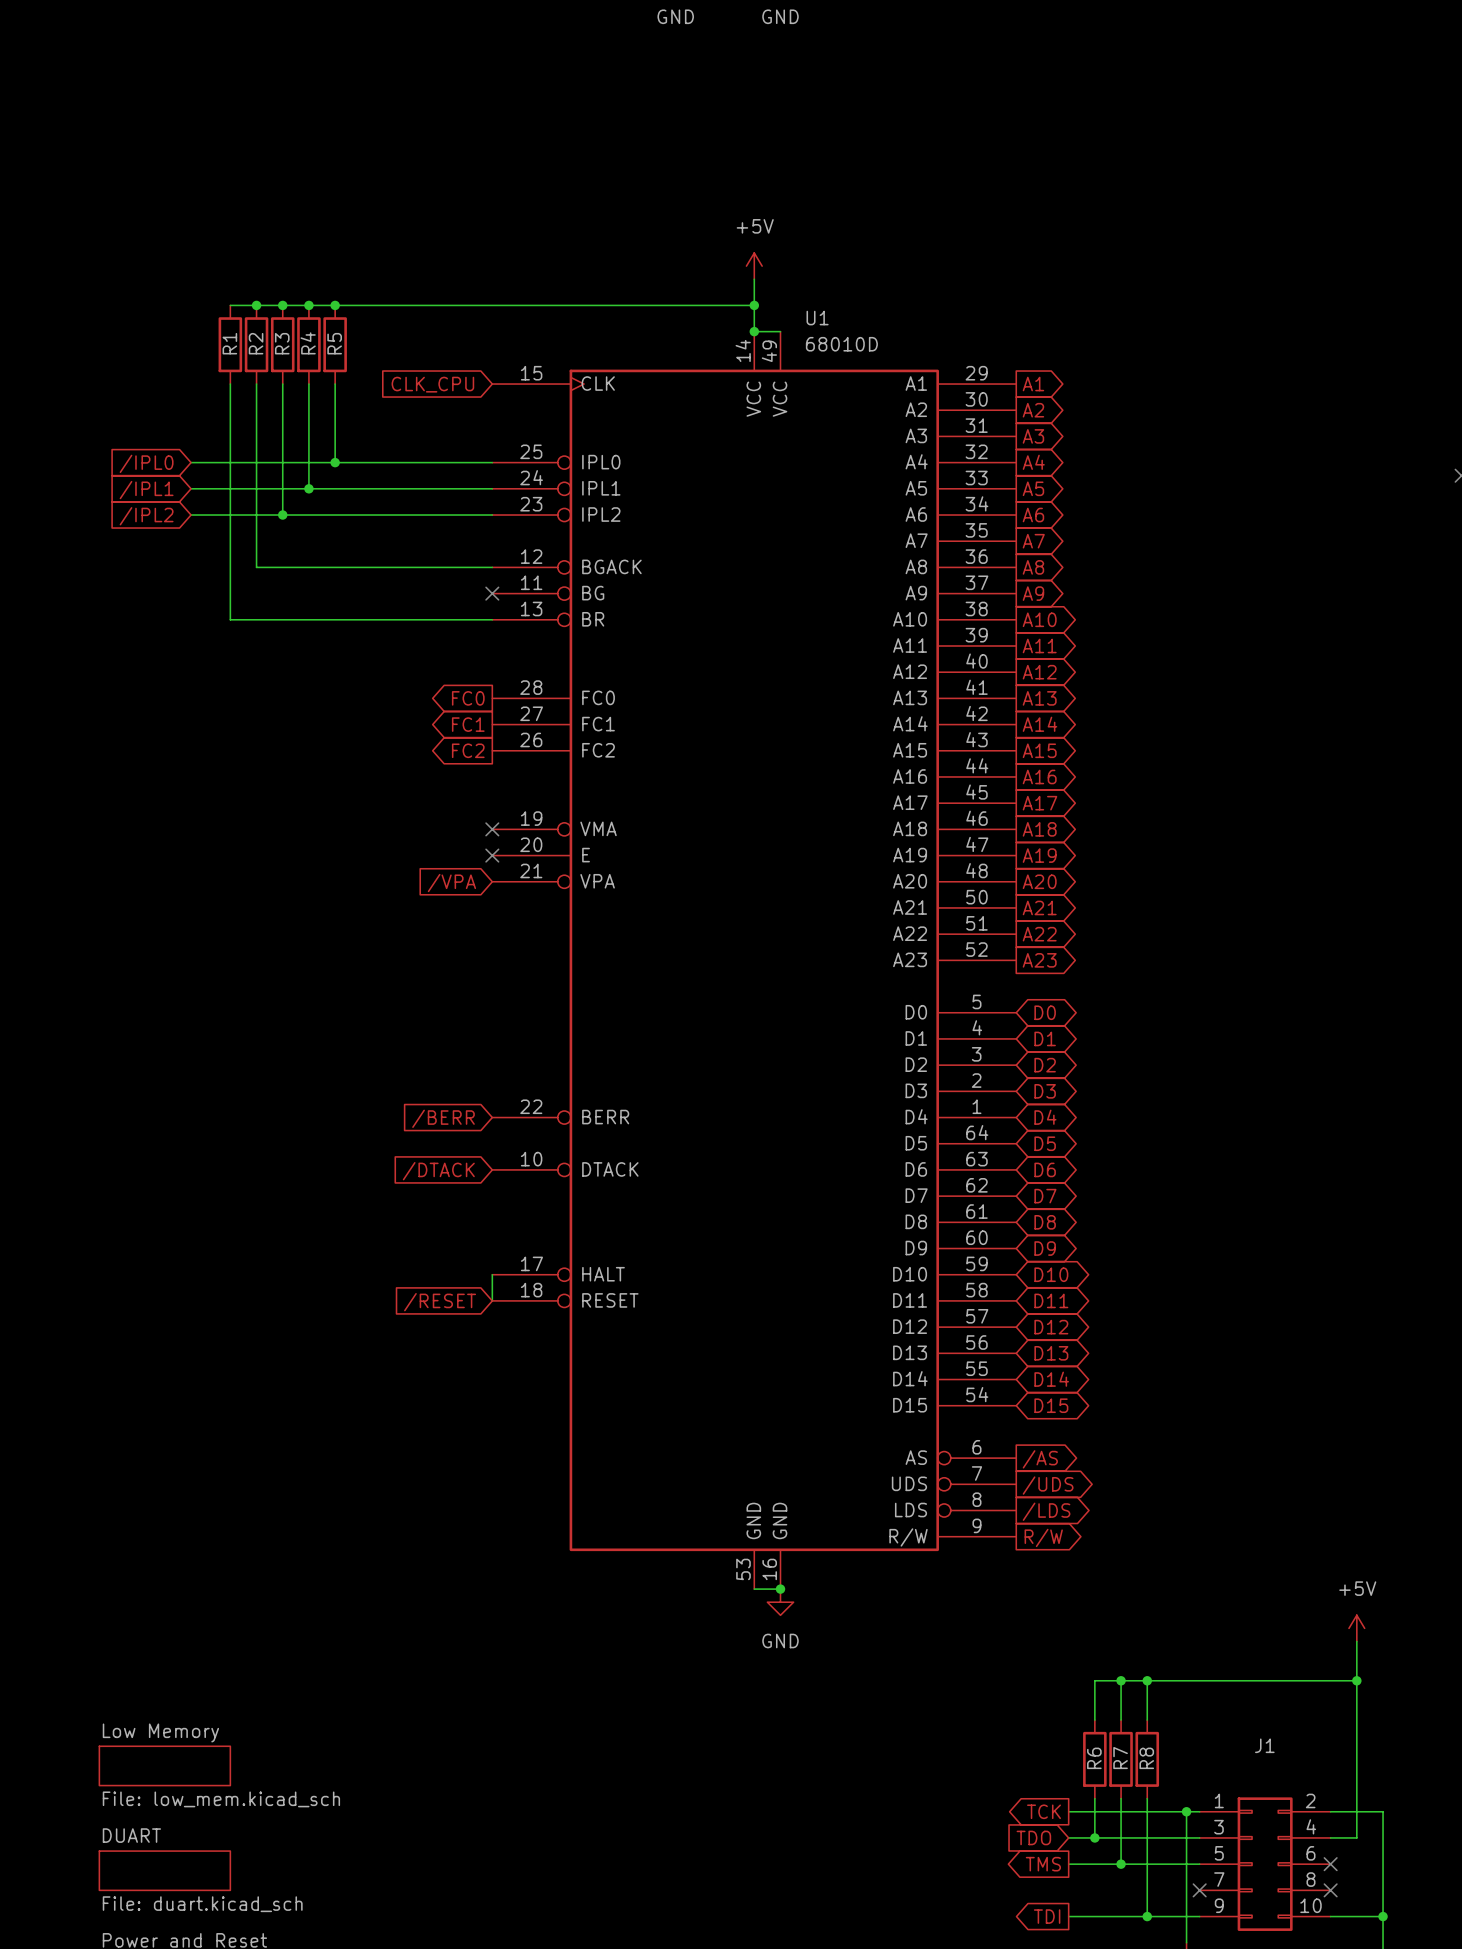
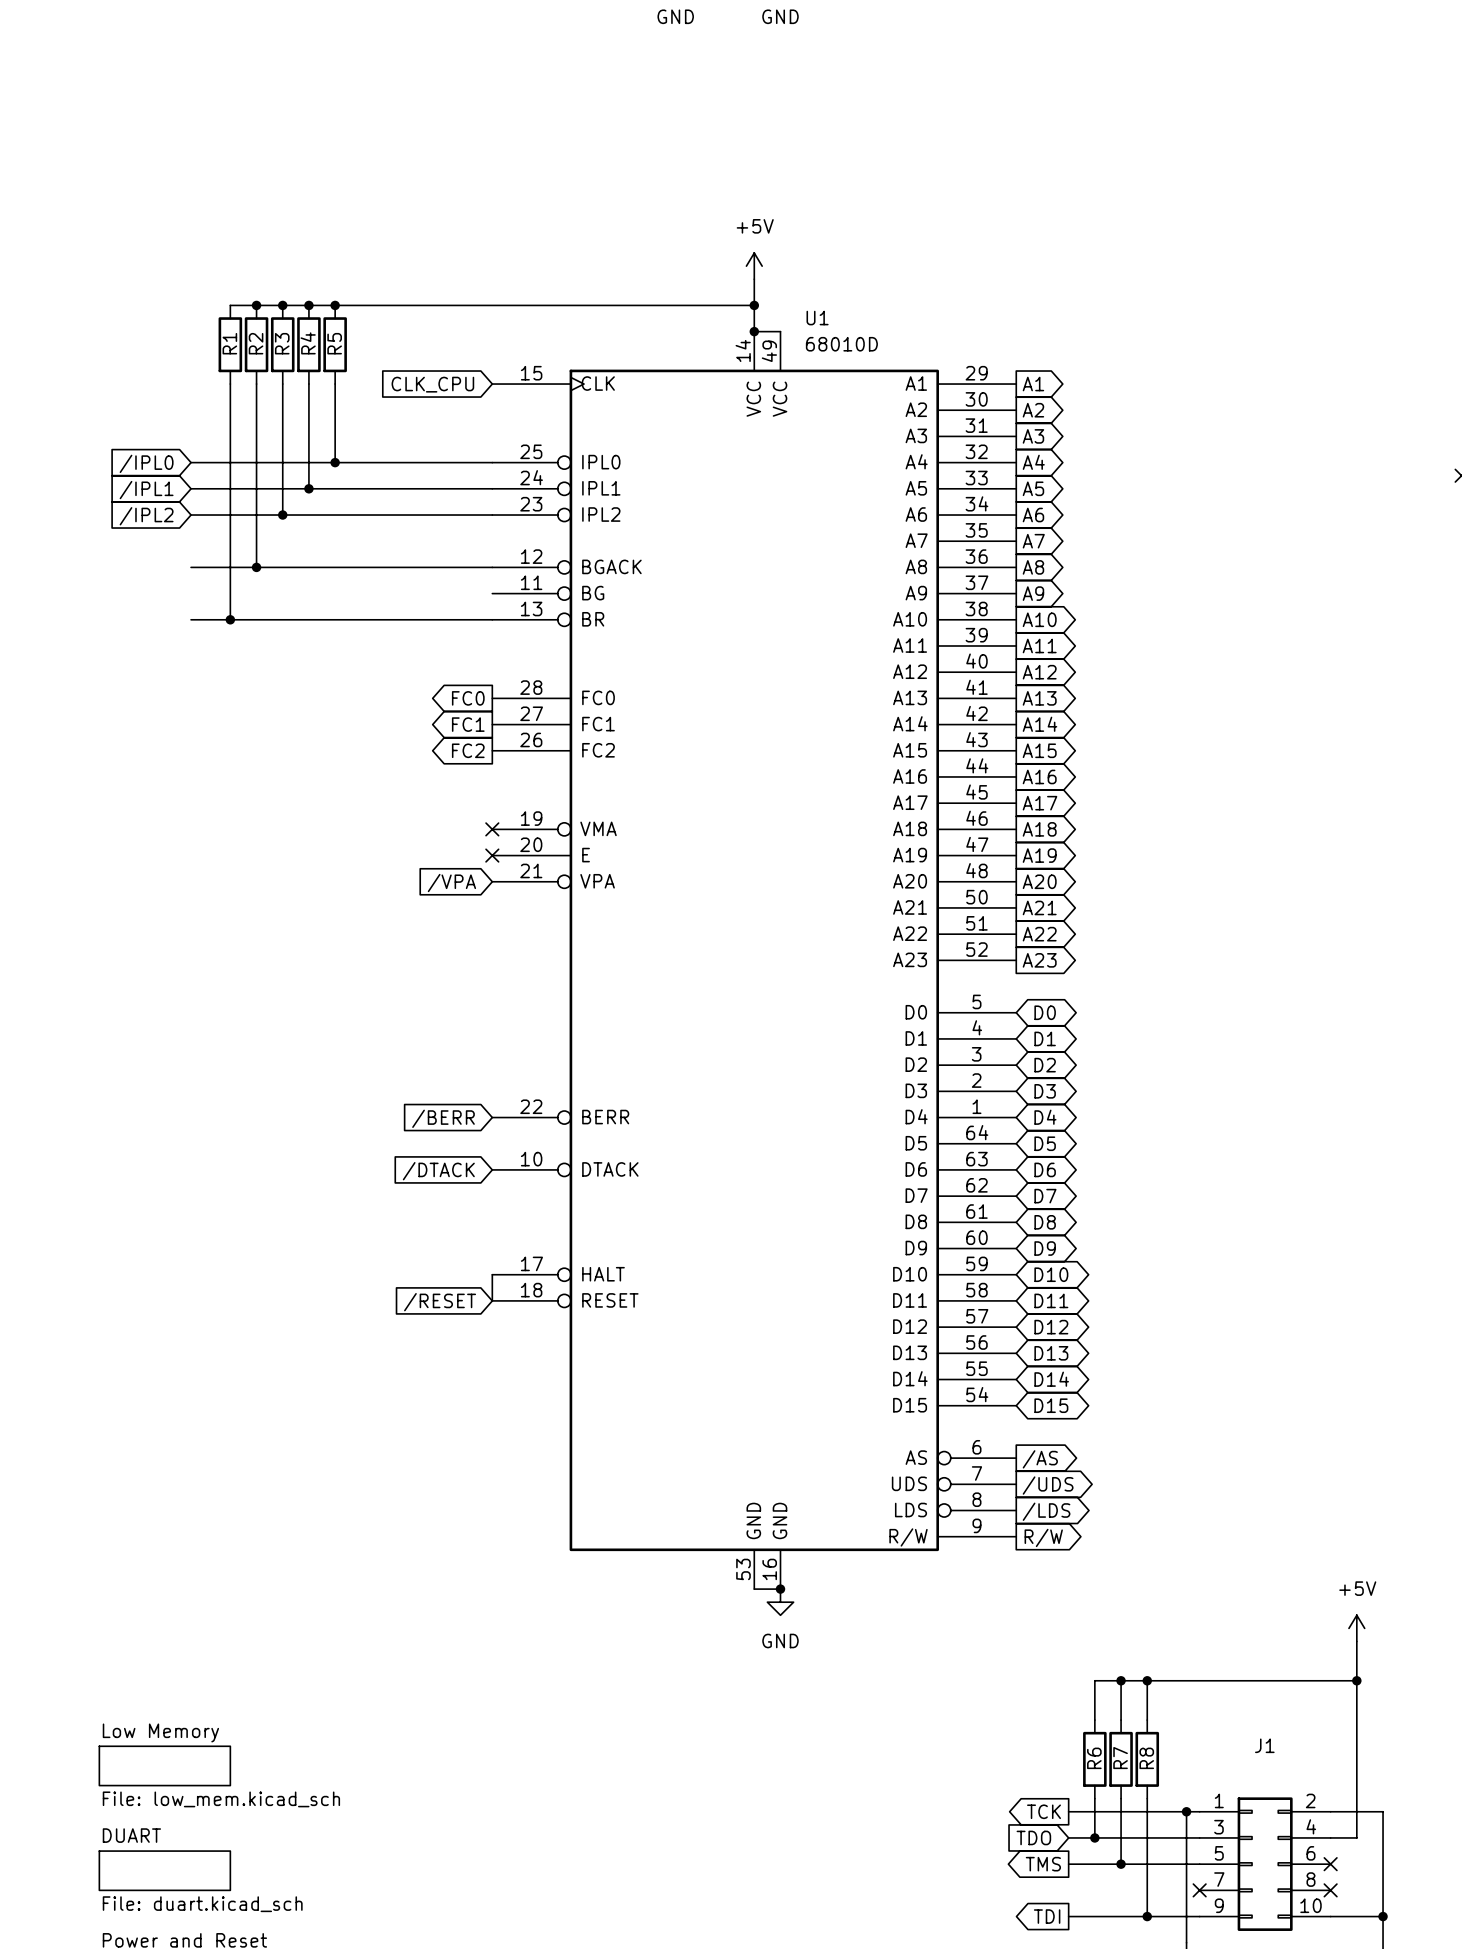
wire: none -> (191, 567) (256, 567)
junction: none -> (256, 567)
no-connect mark: (492, 593) -> none
wire: none -> (191, 619) (230, 619)
junction: none -> (230, 619)

